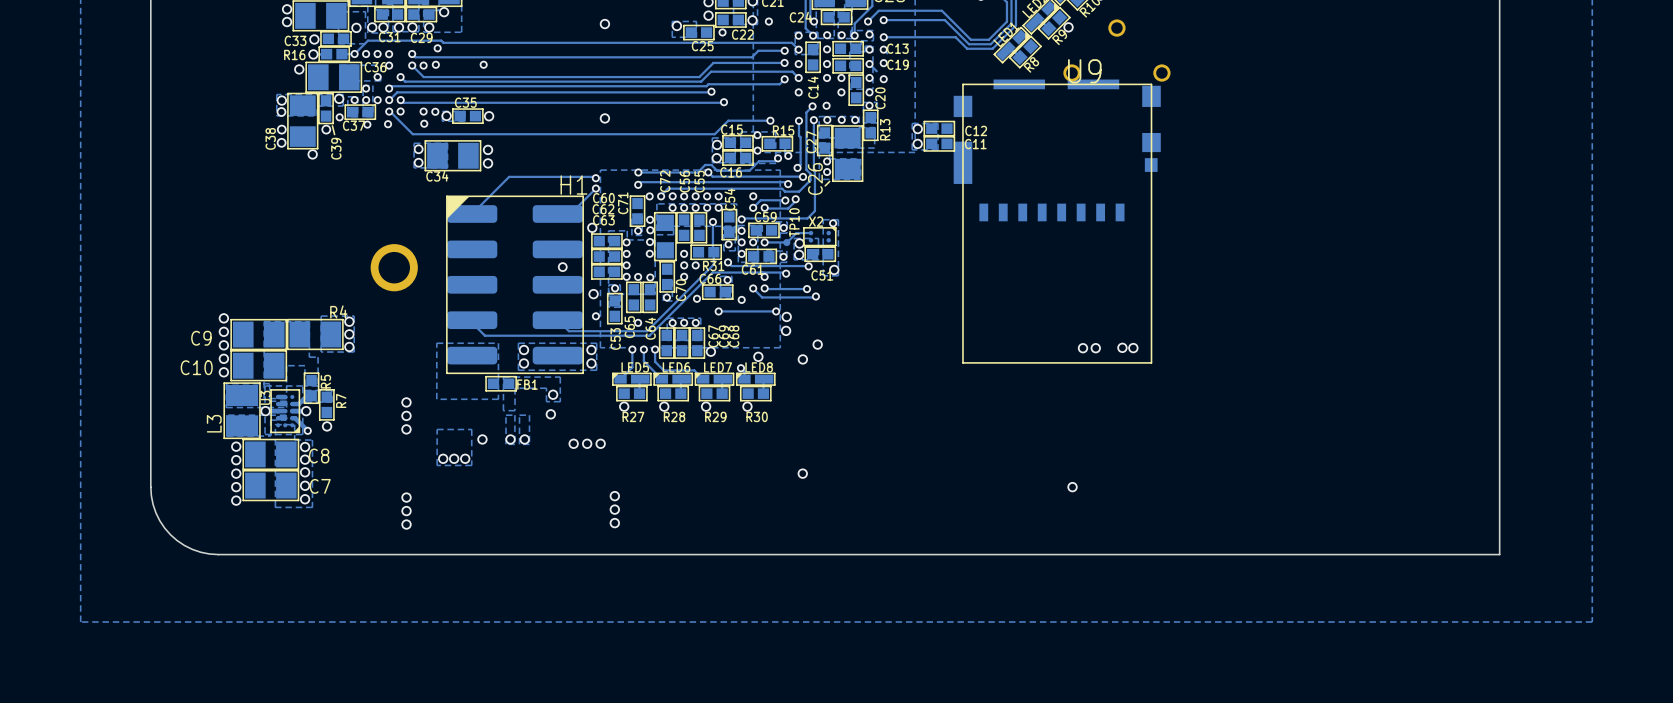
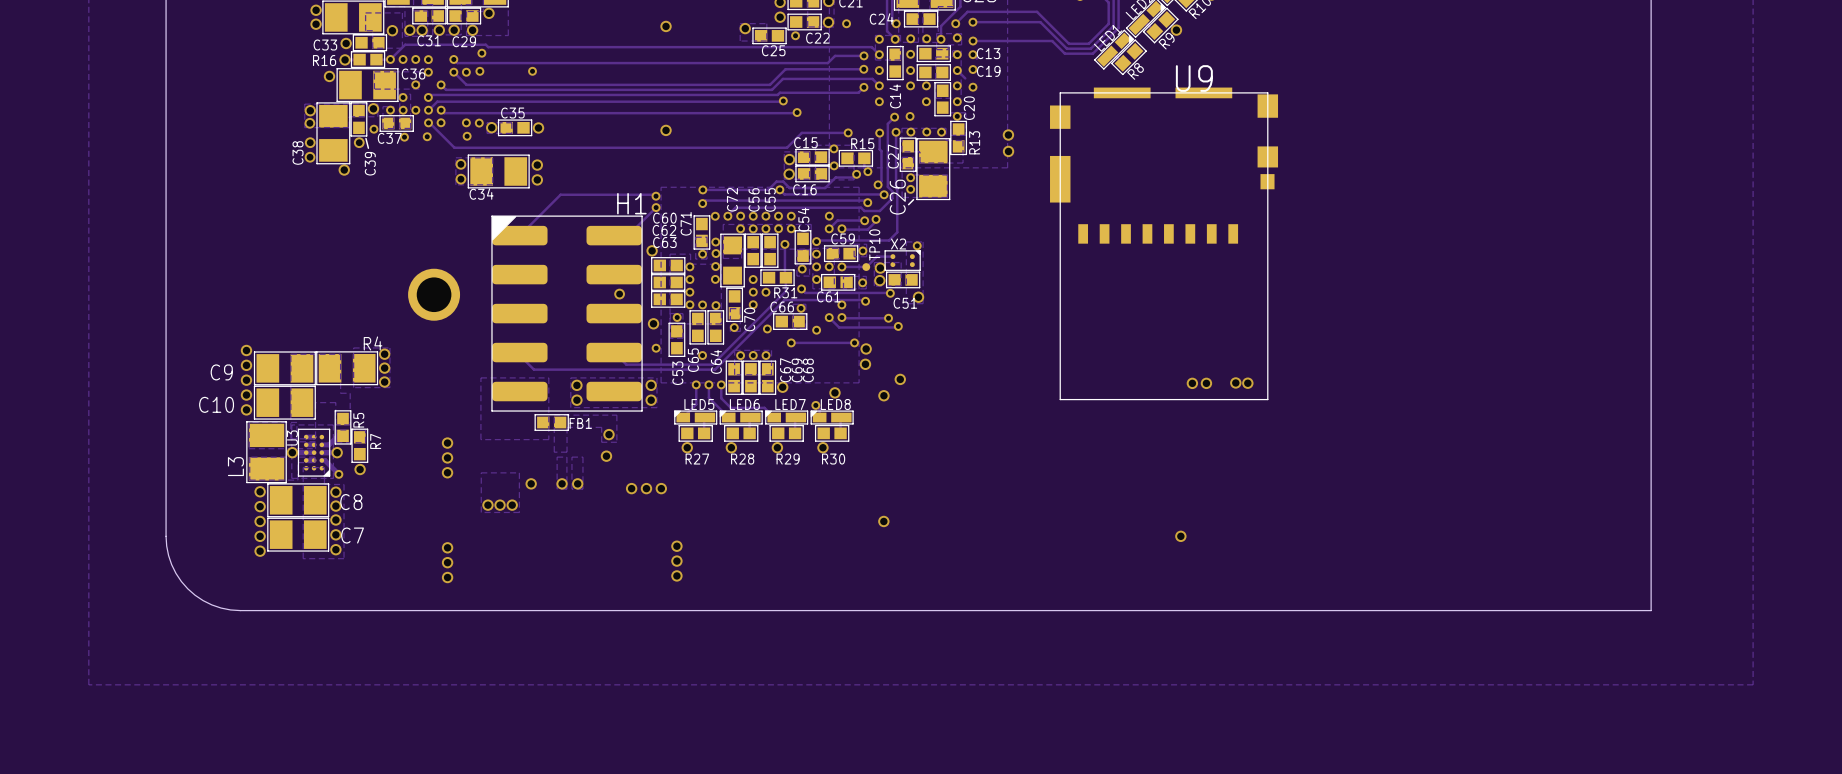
part: (1116, 50) -> none
via: none -> (1008, 135)
zone outline: (938, 123) (938, 149) (912, 149) (912, 123) (938, 123) -> none
C12: (939, 128) -> none
via: (917, 129) -> none
via: none -> (1008, 151)
via: (917, 143) -> none
C11: (939, 143) -> none

